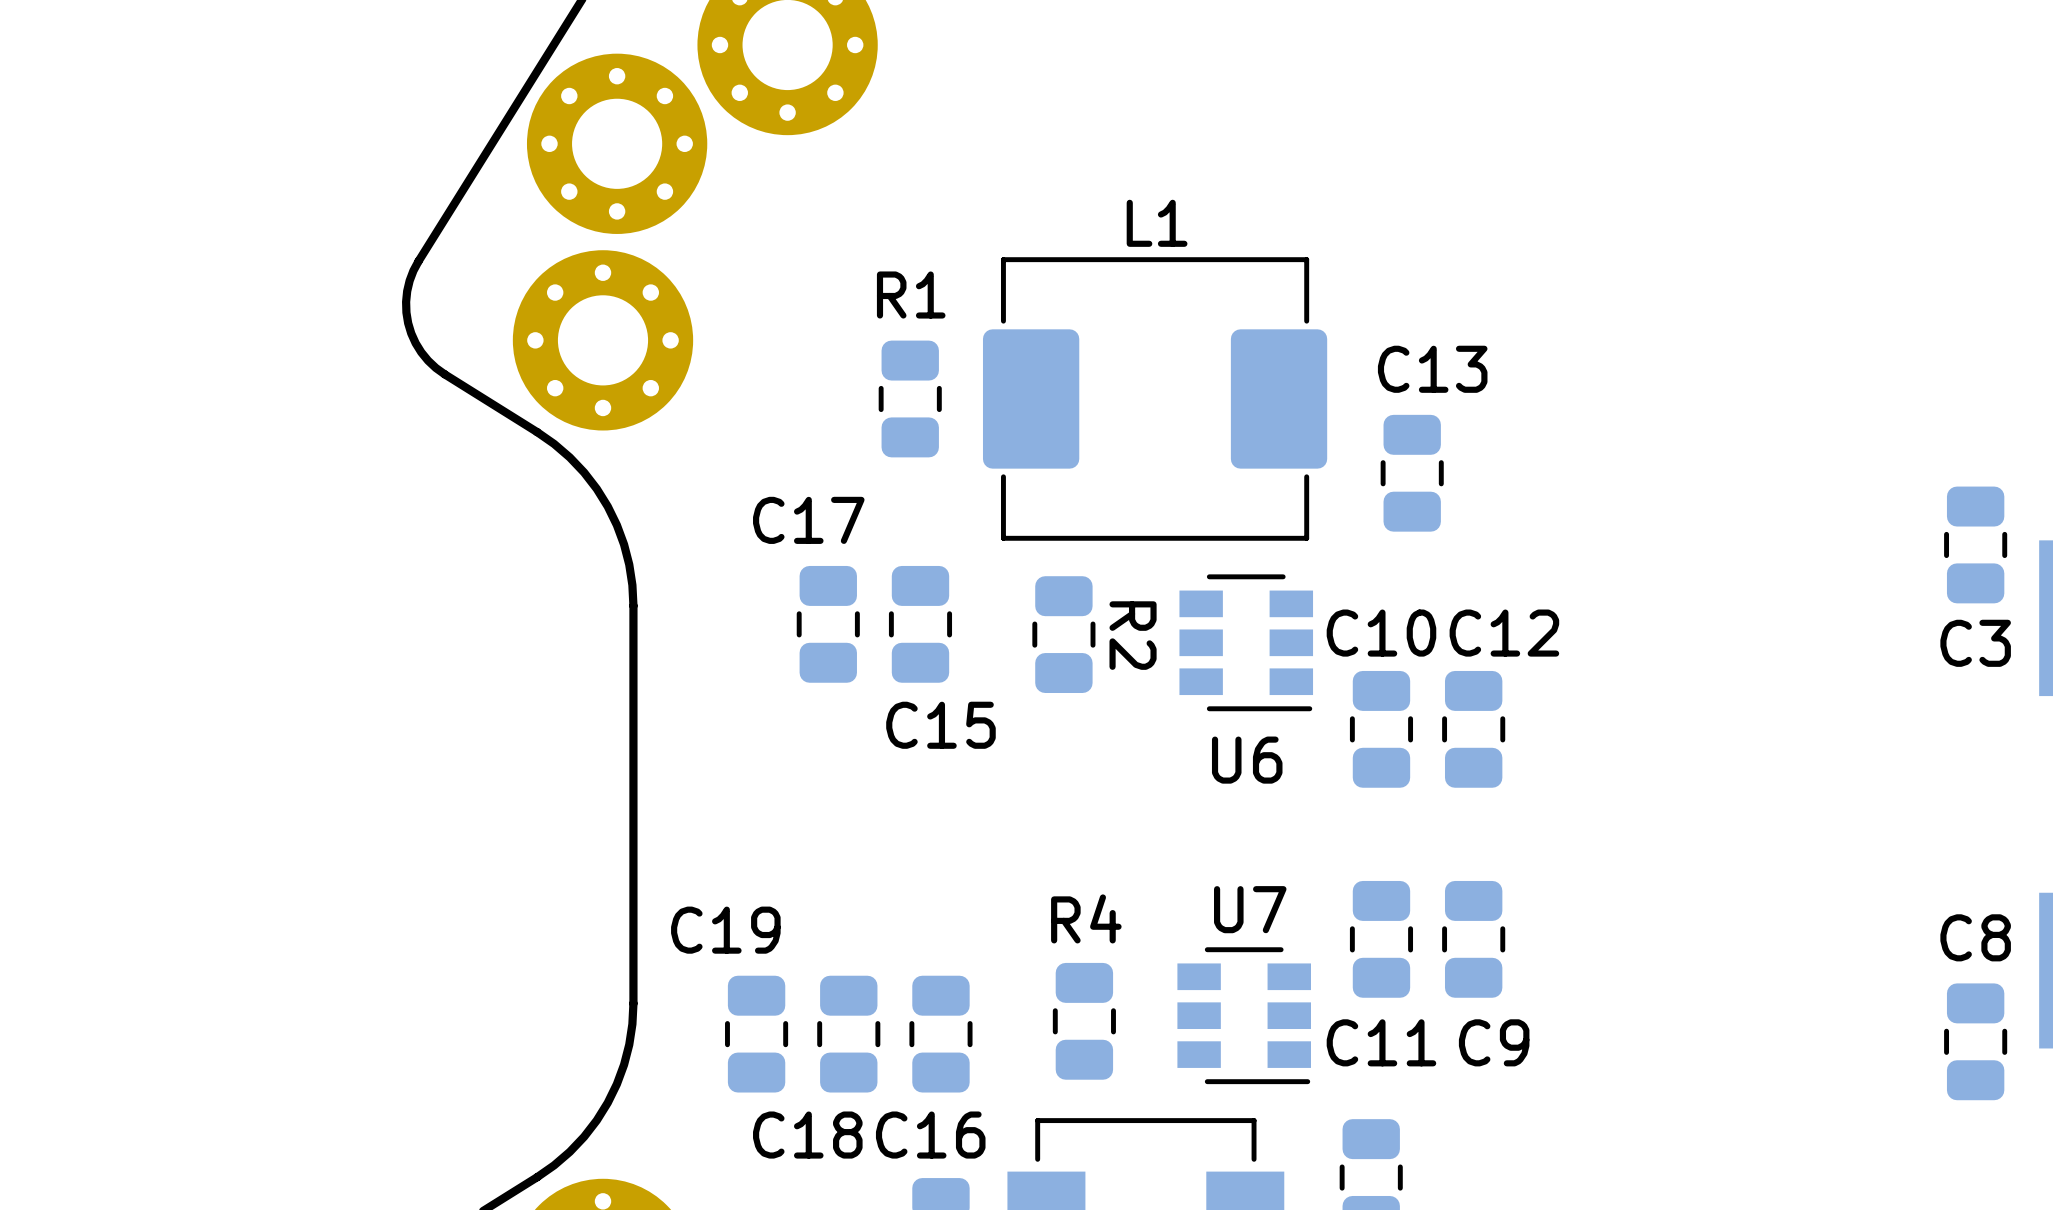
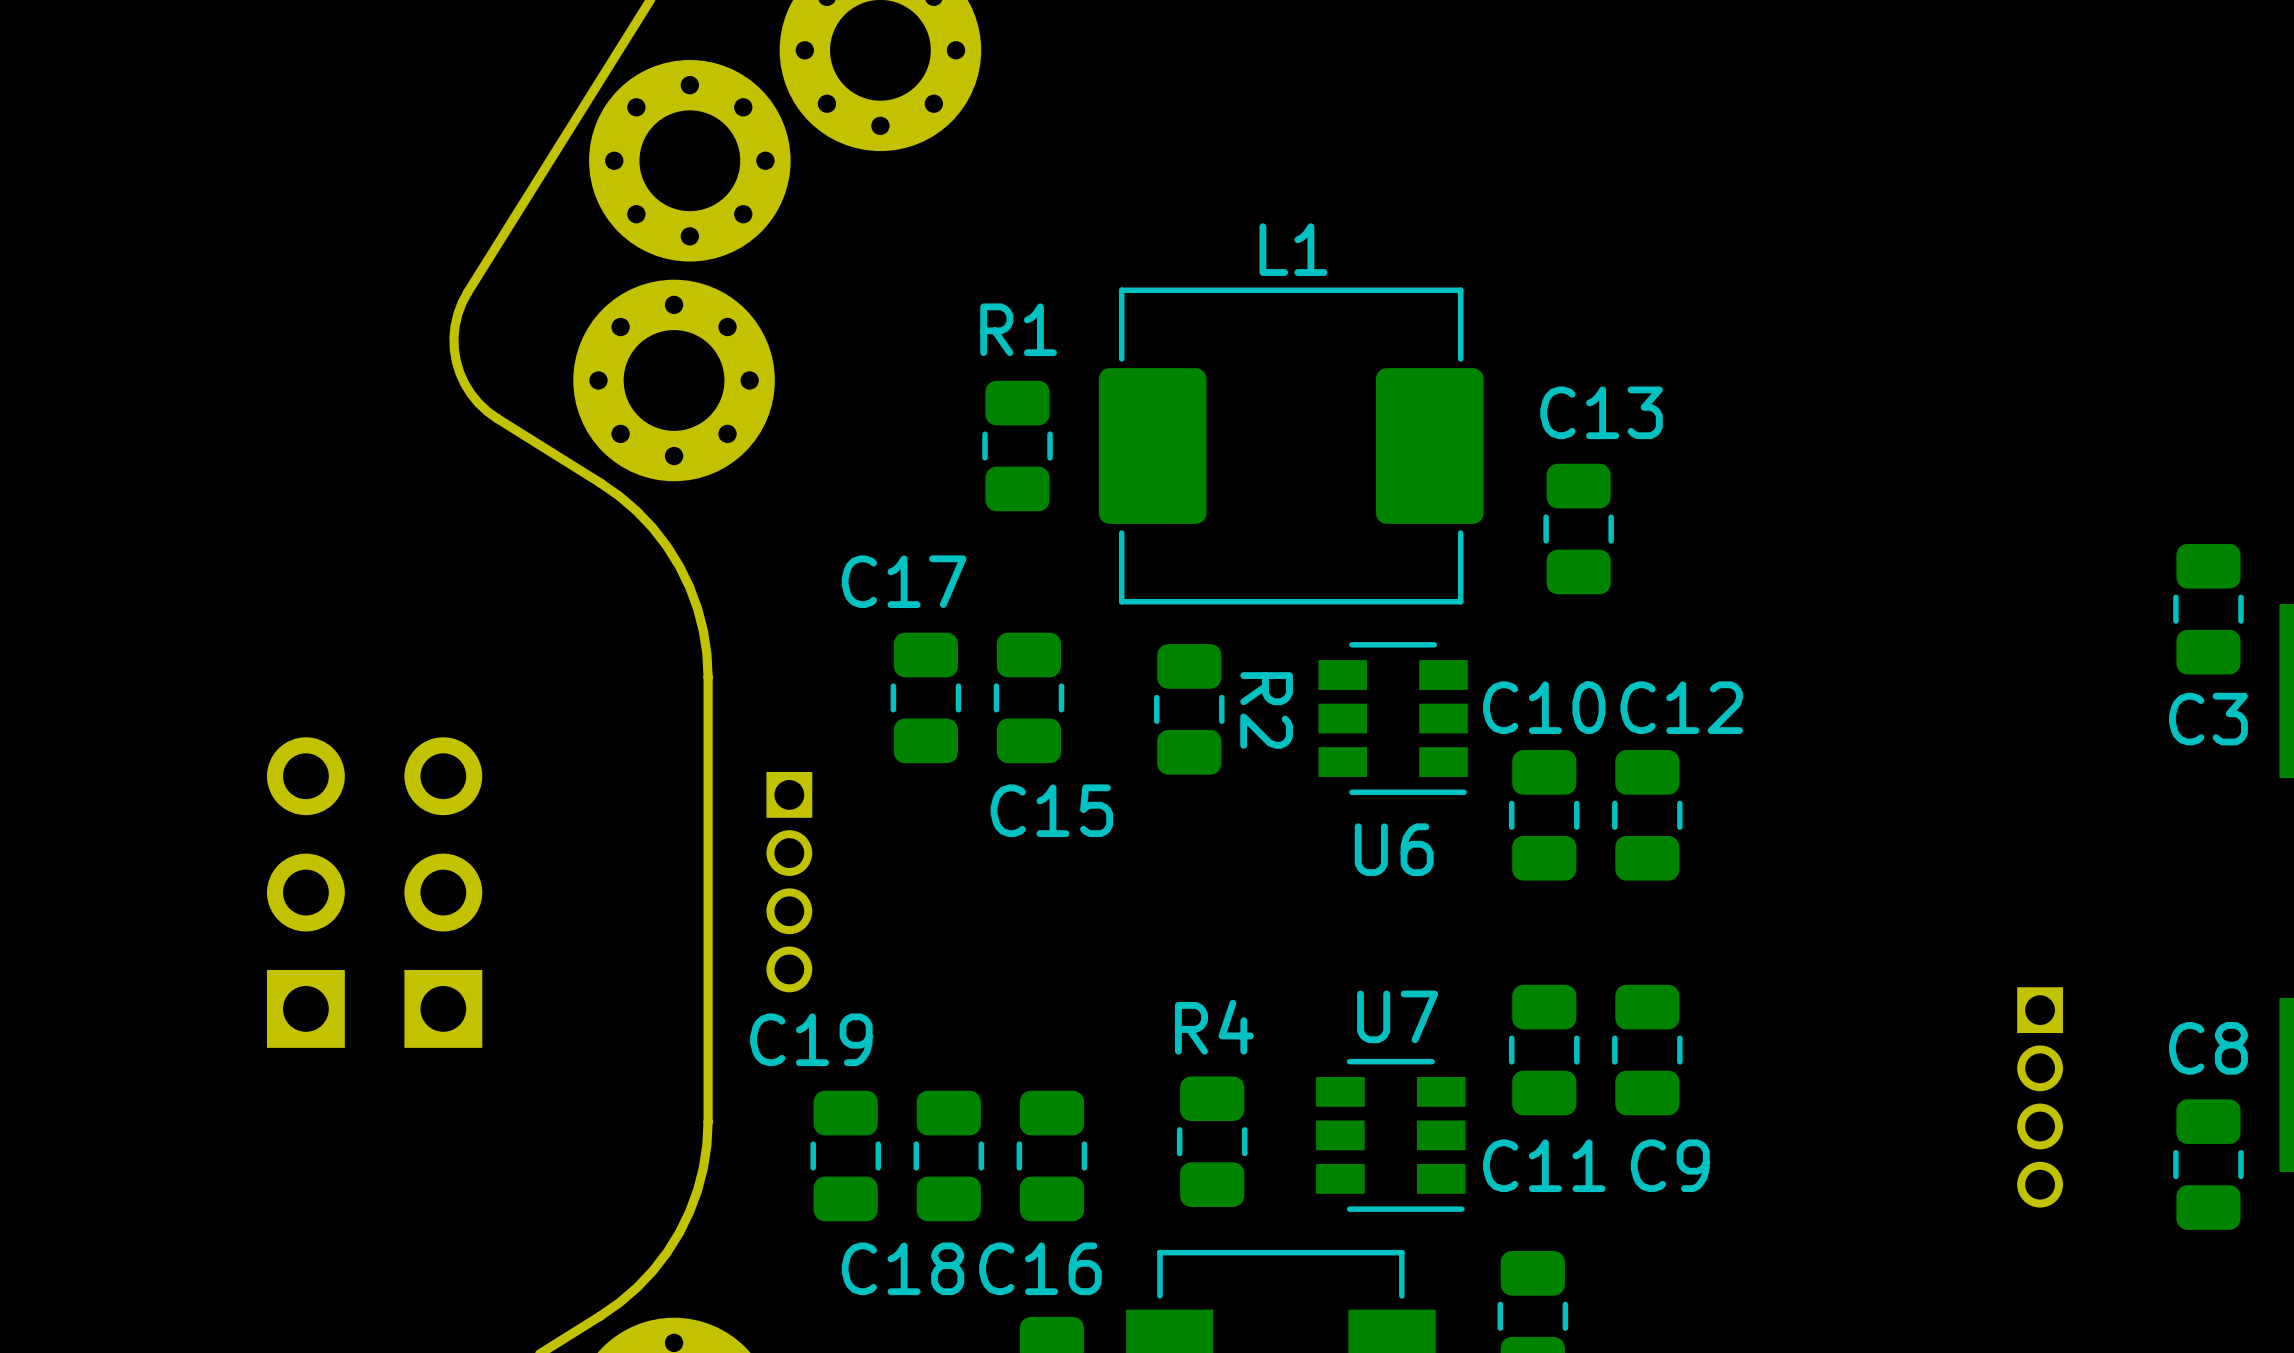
part: none -> (789, 882)
part: none -> (305, 892)
part: none -> (443, 892)
part: none -> (2040, 1097)

